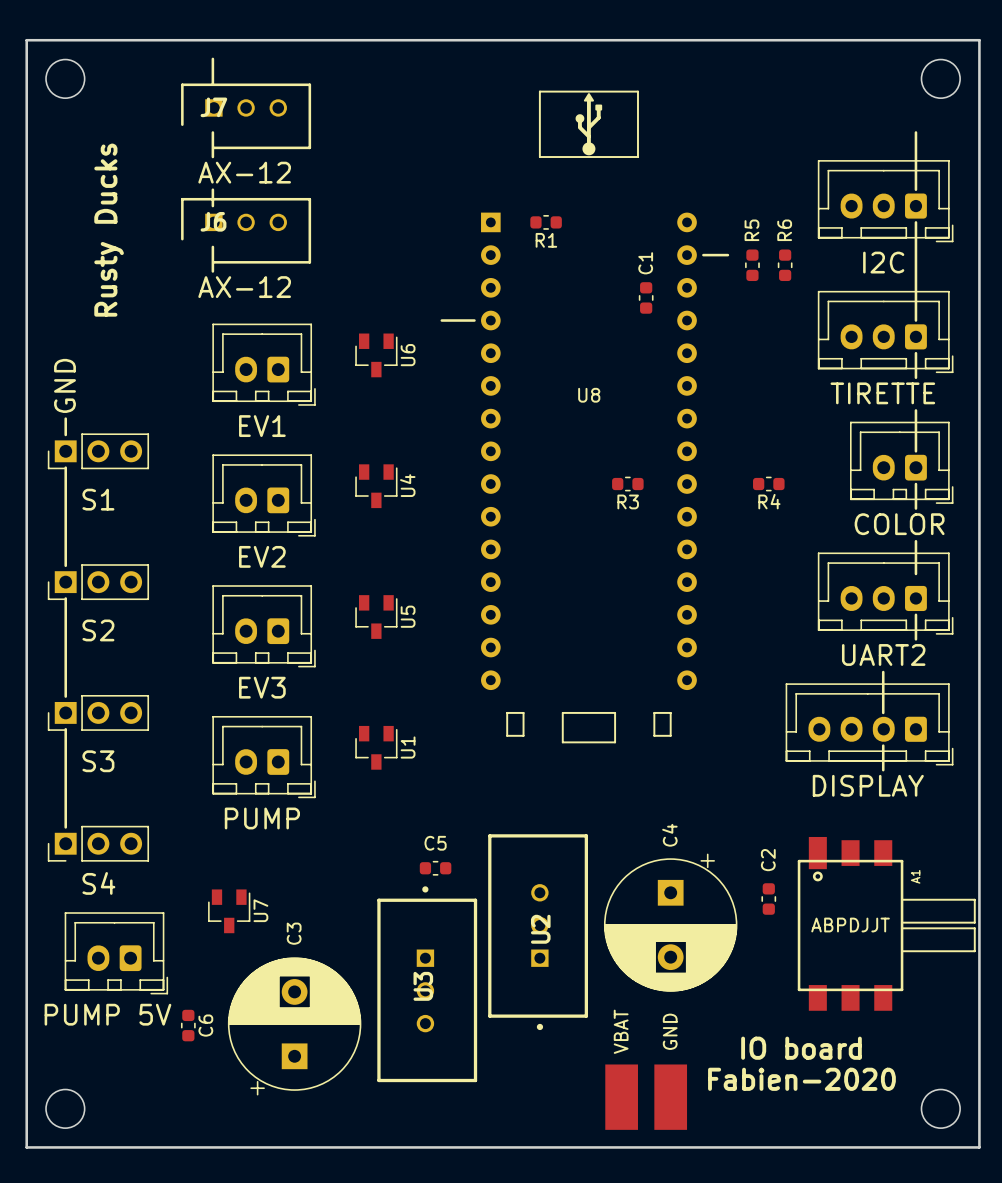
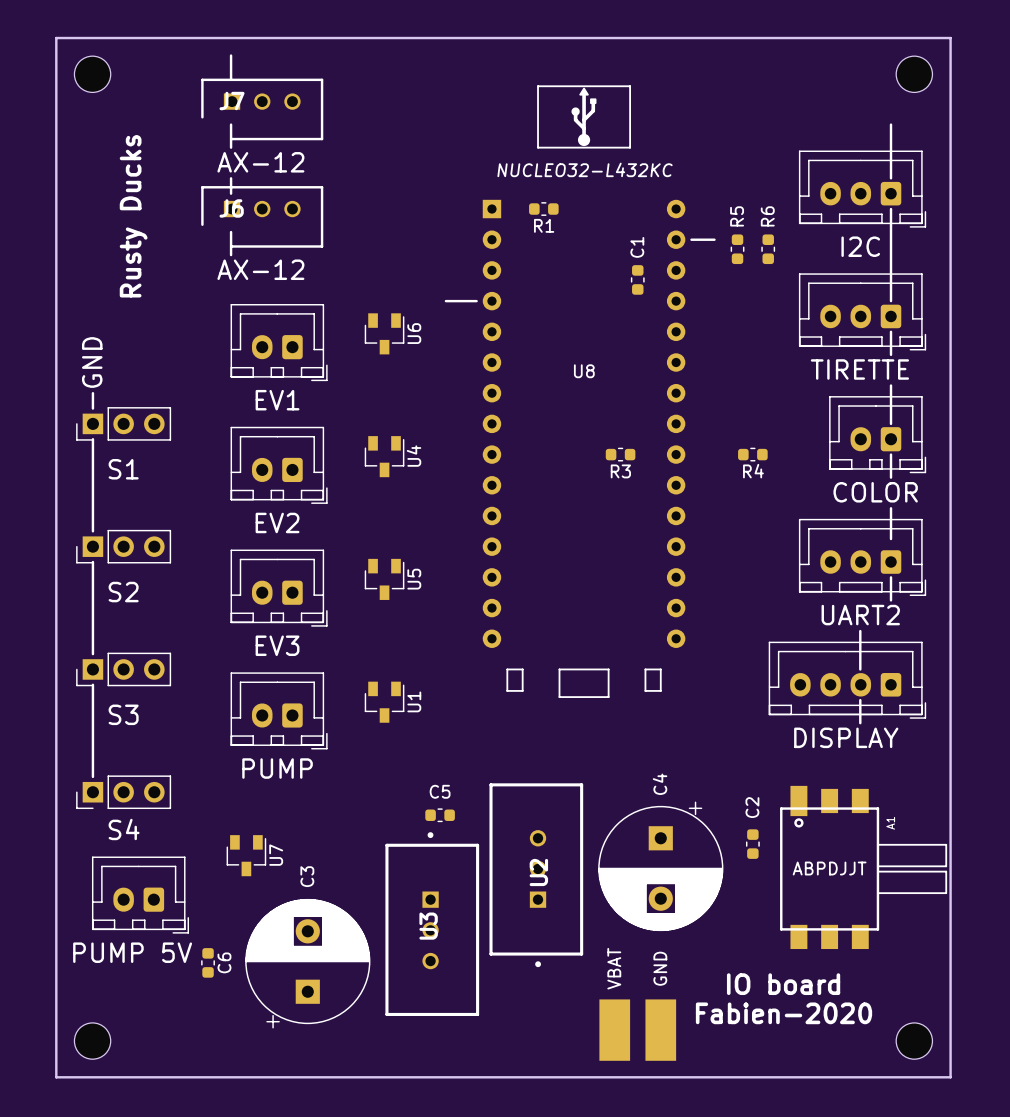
U8 value: none -> NUCLEO32-L432KC (585, 169)

